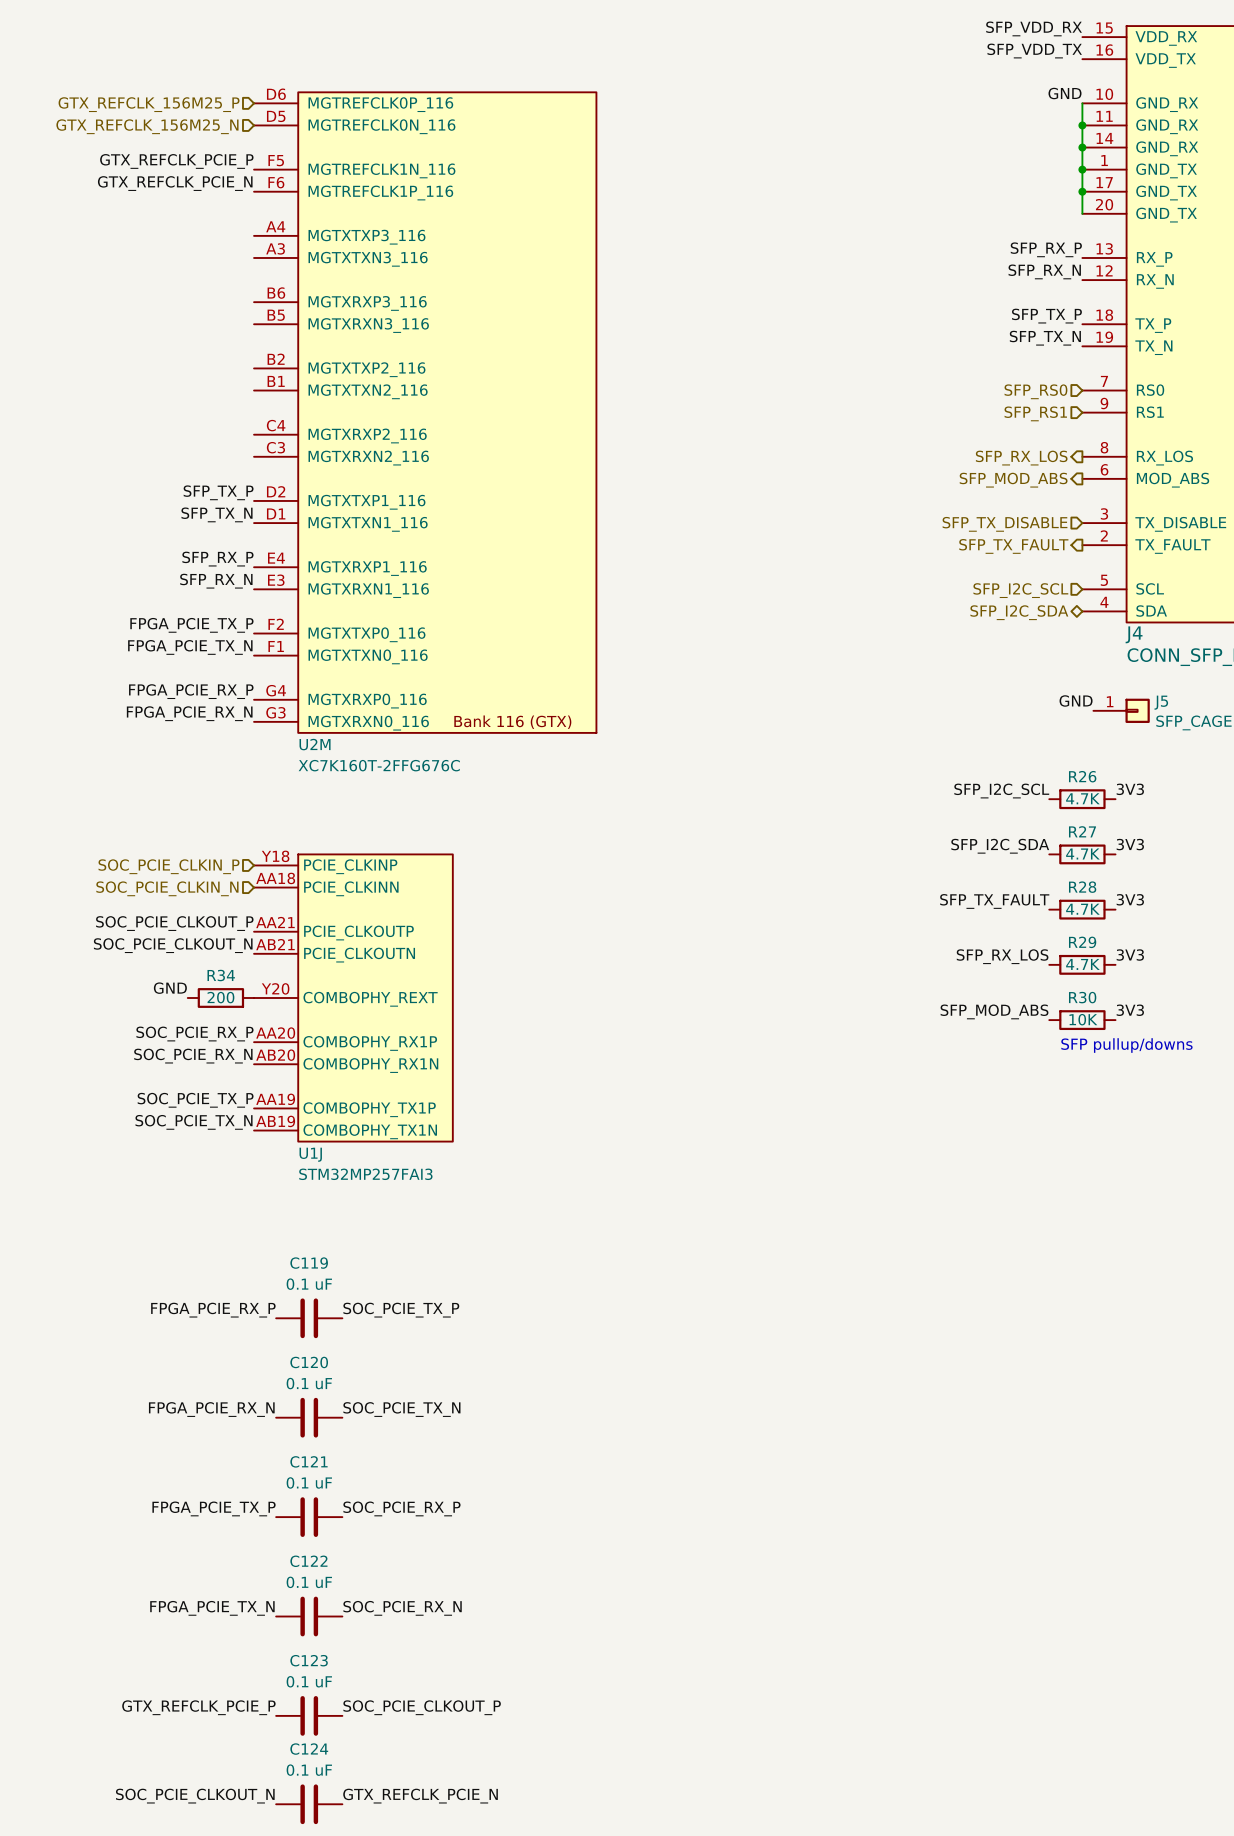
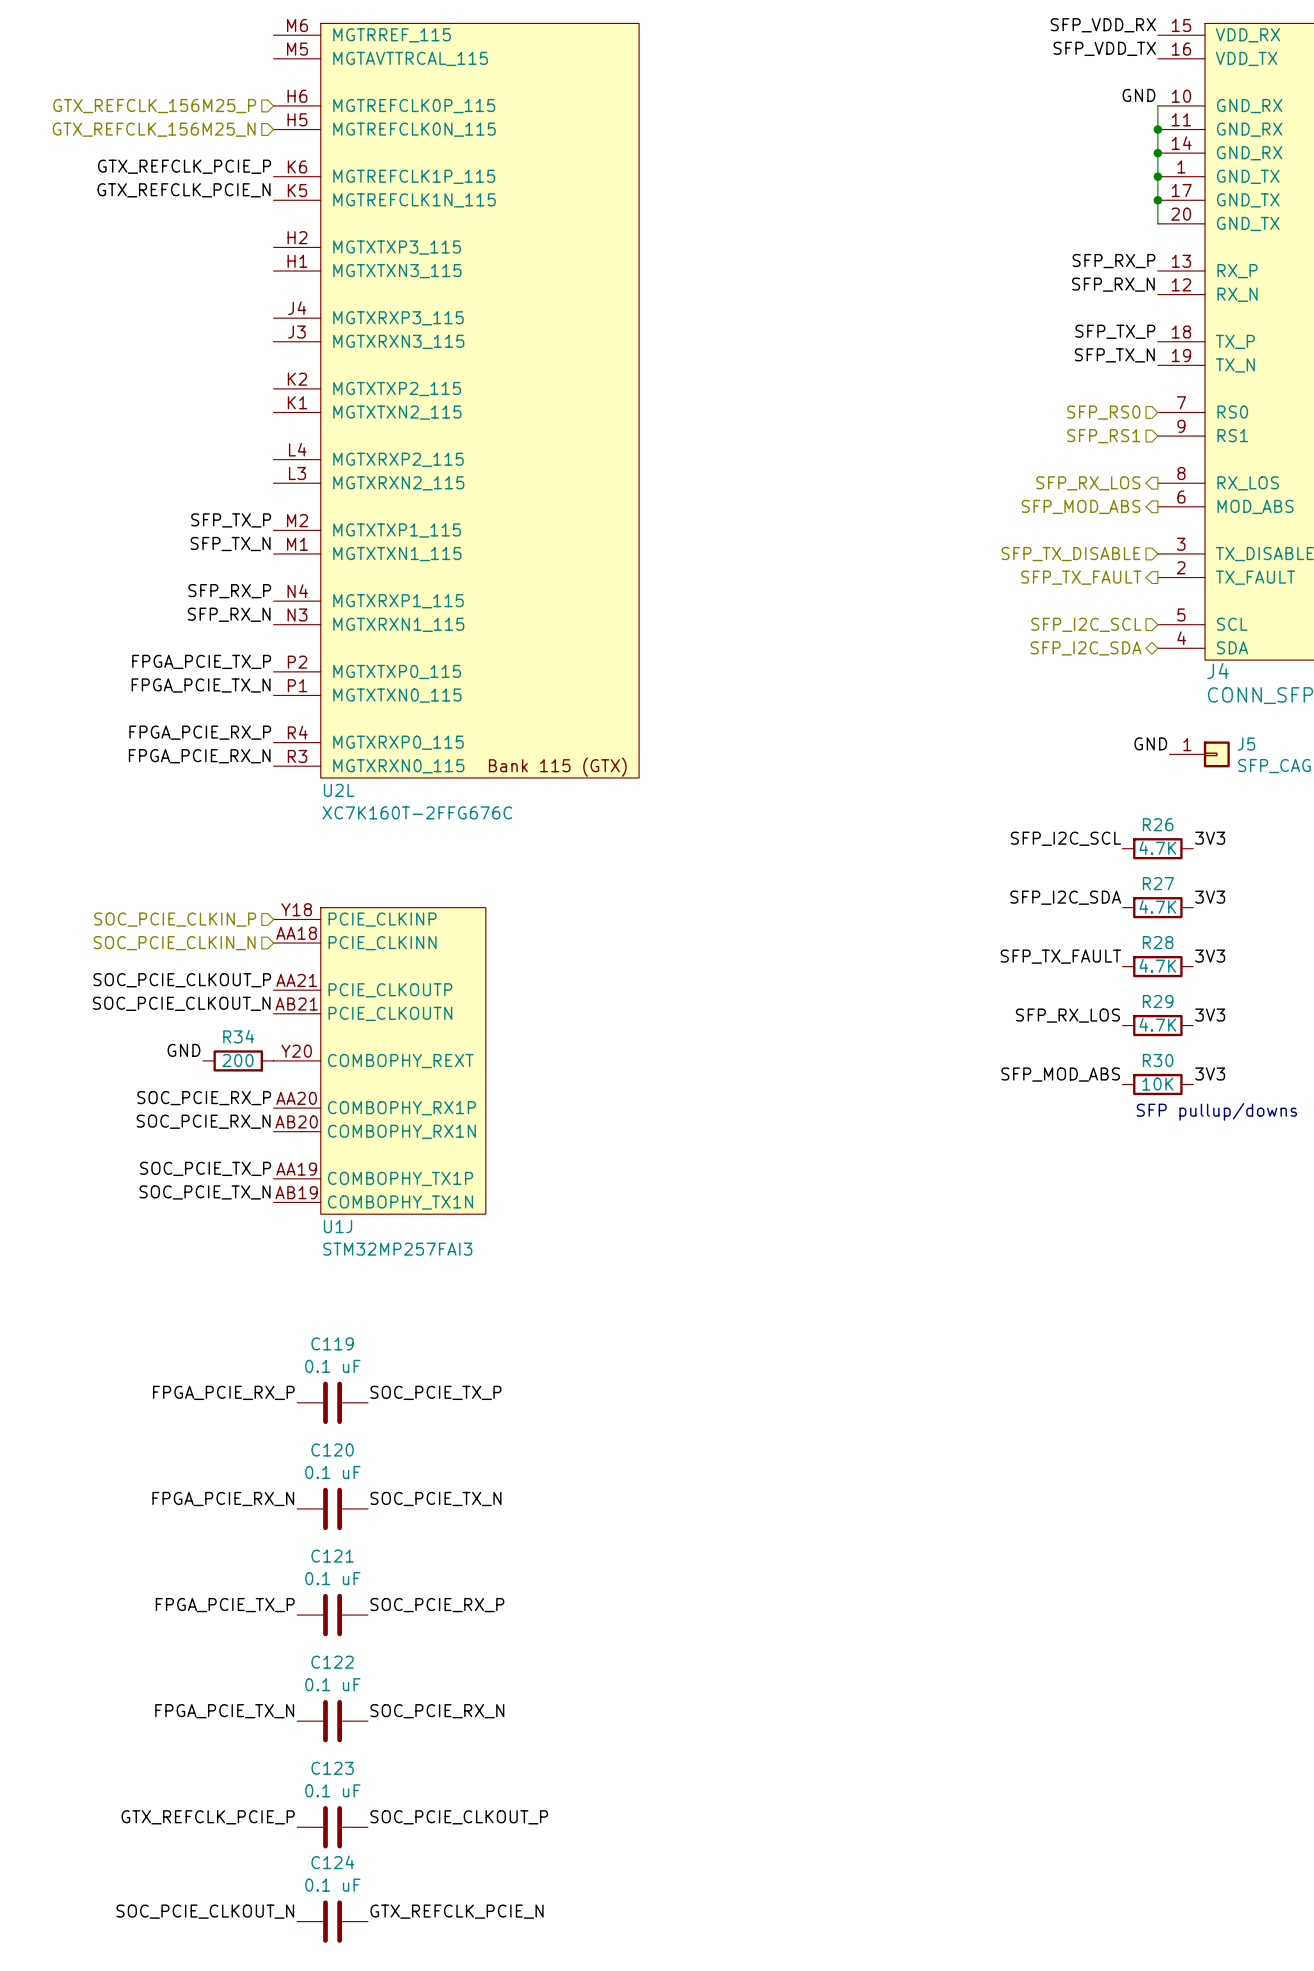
U2L: none -> XC7K160T-2FFG676C (456, 400)
U2M: XC7K160T-2FFG676C (425, 412) -> none

